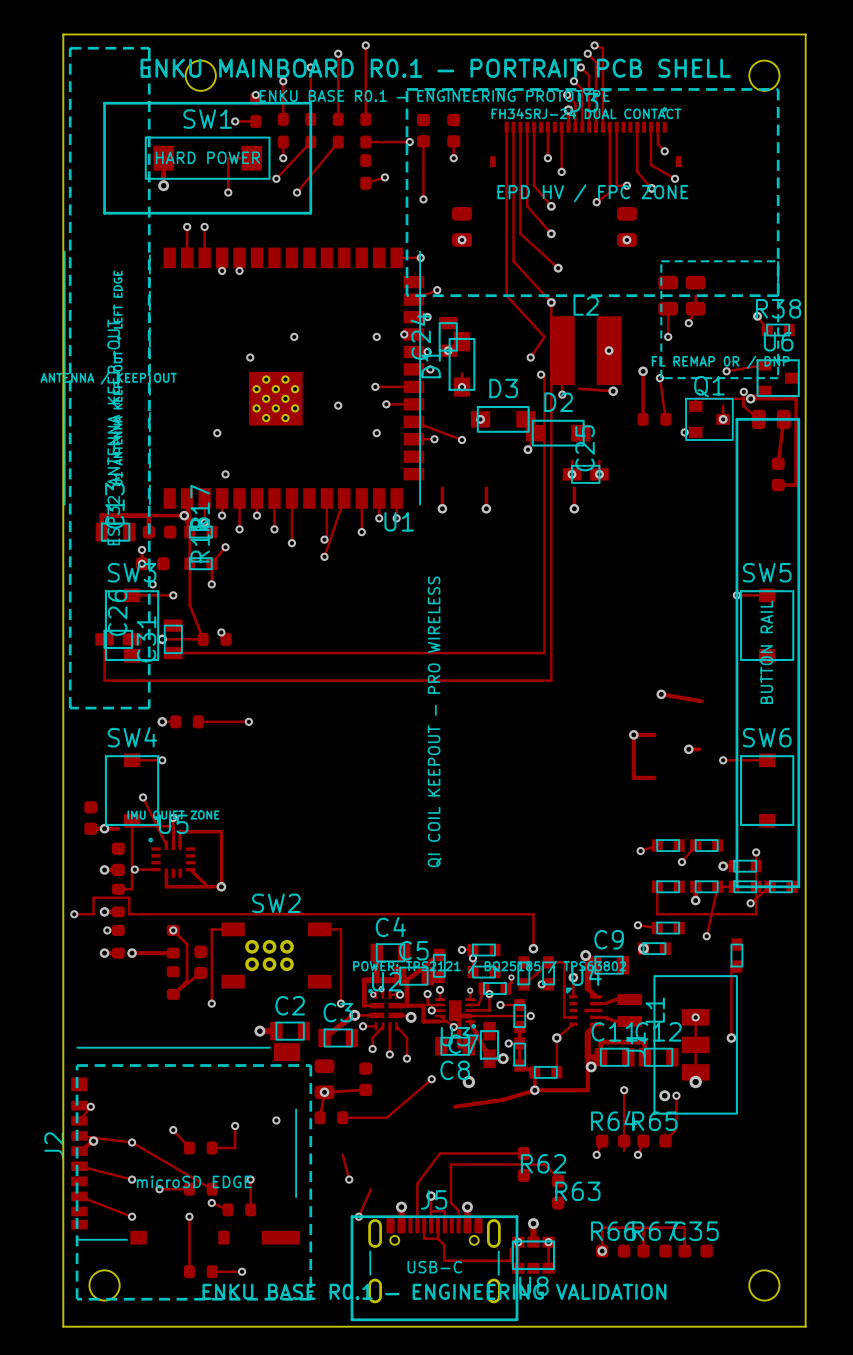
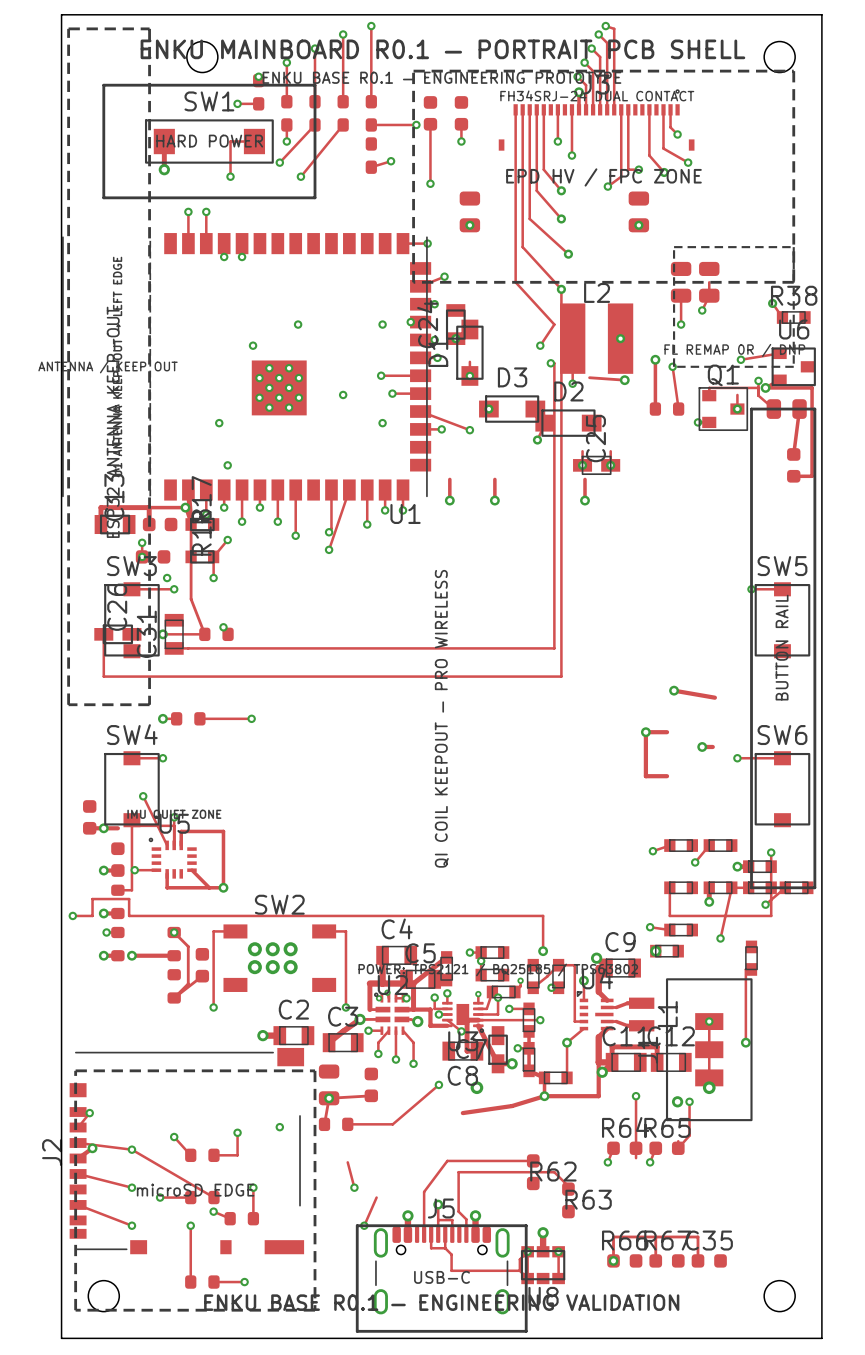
via position: (152, 584) -> (167, 578)

